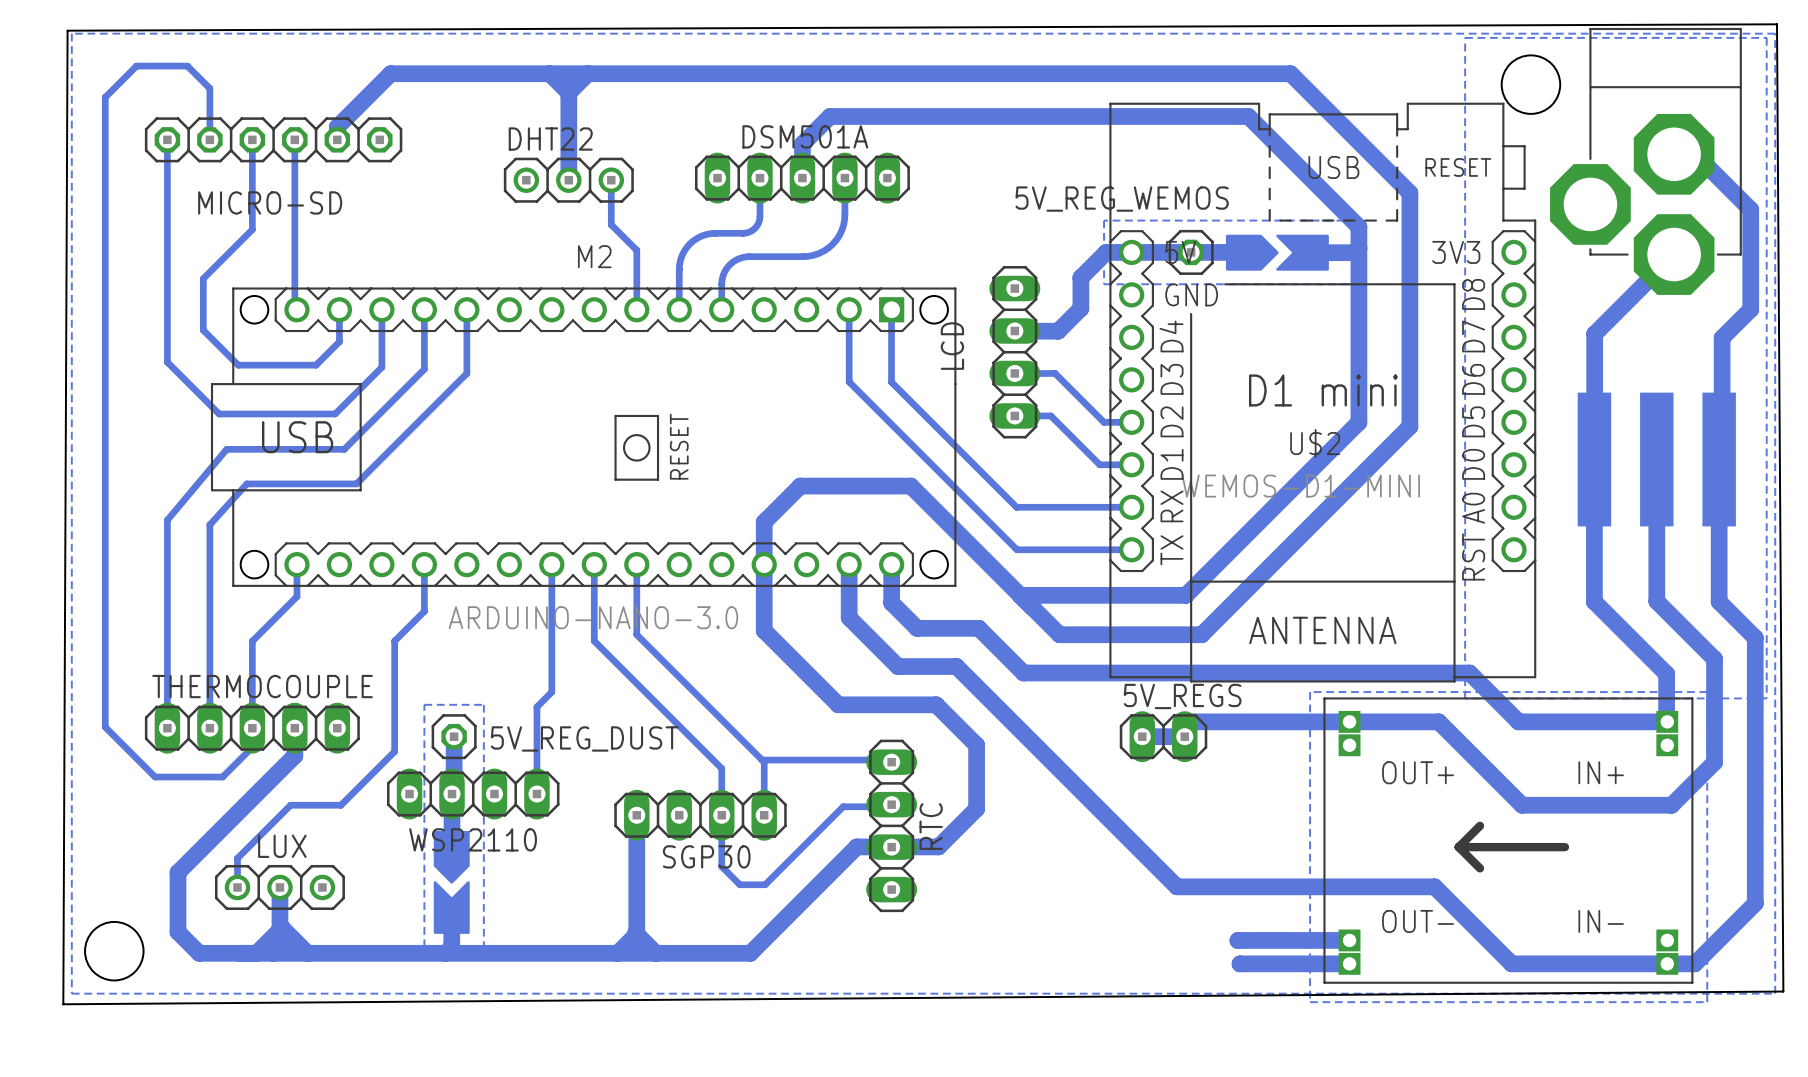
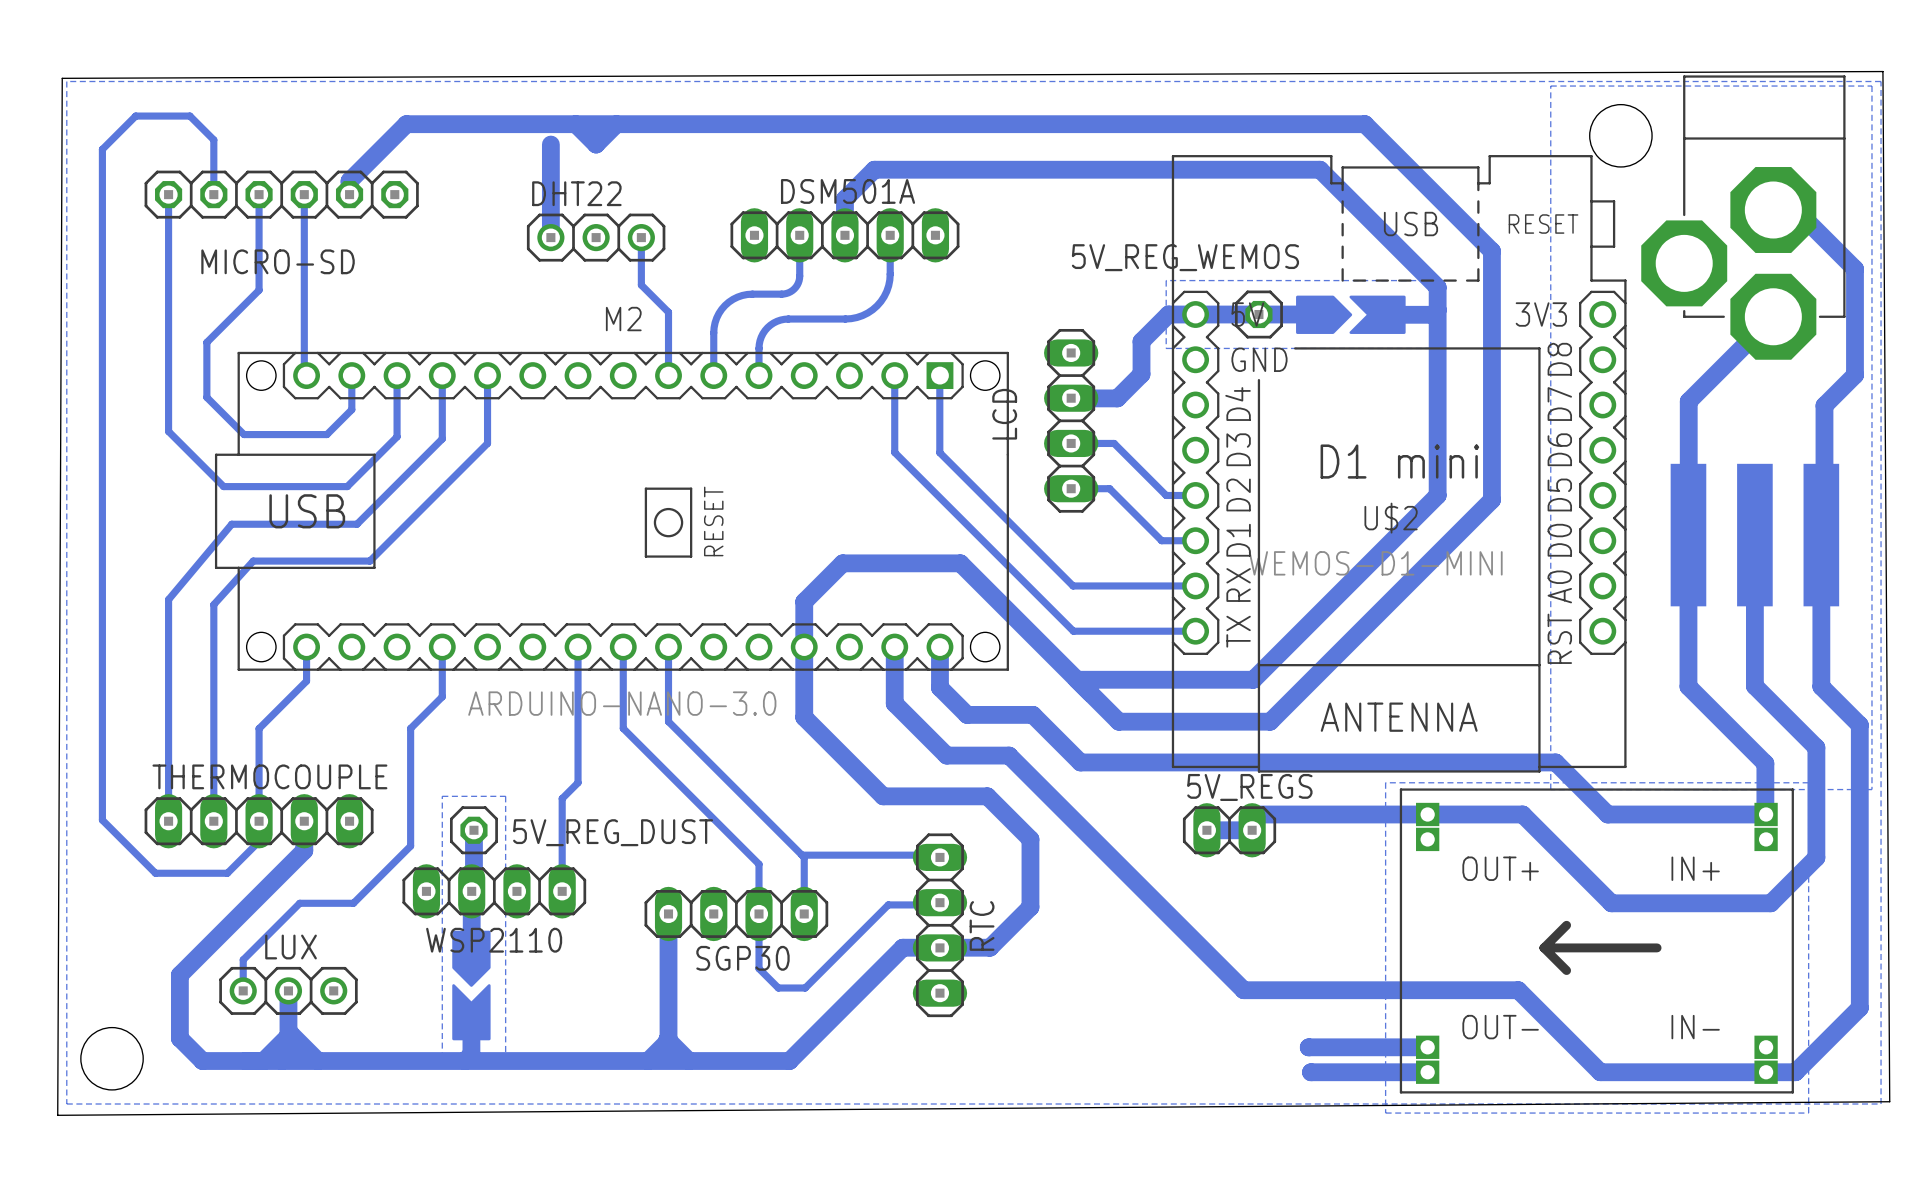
bottom track: (568, 92) (568, 180) -> (550, 144) (550, 237)

